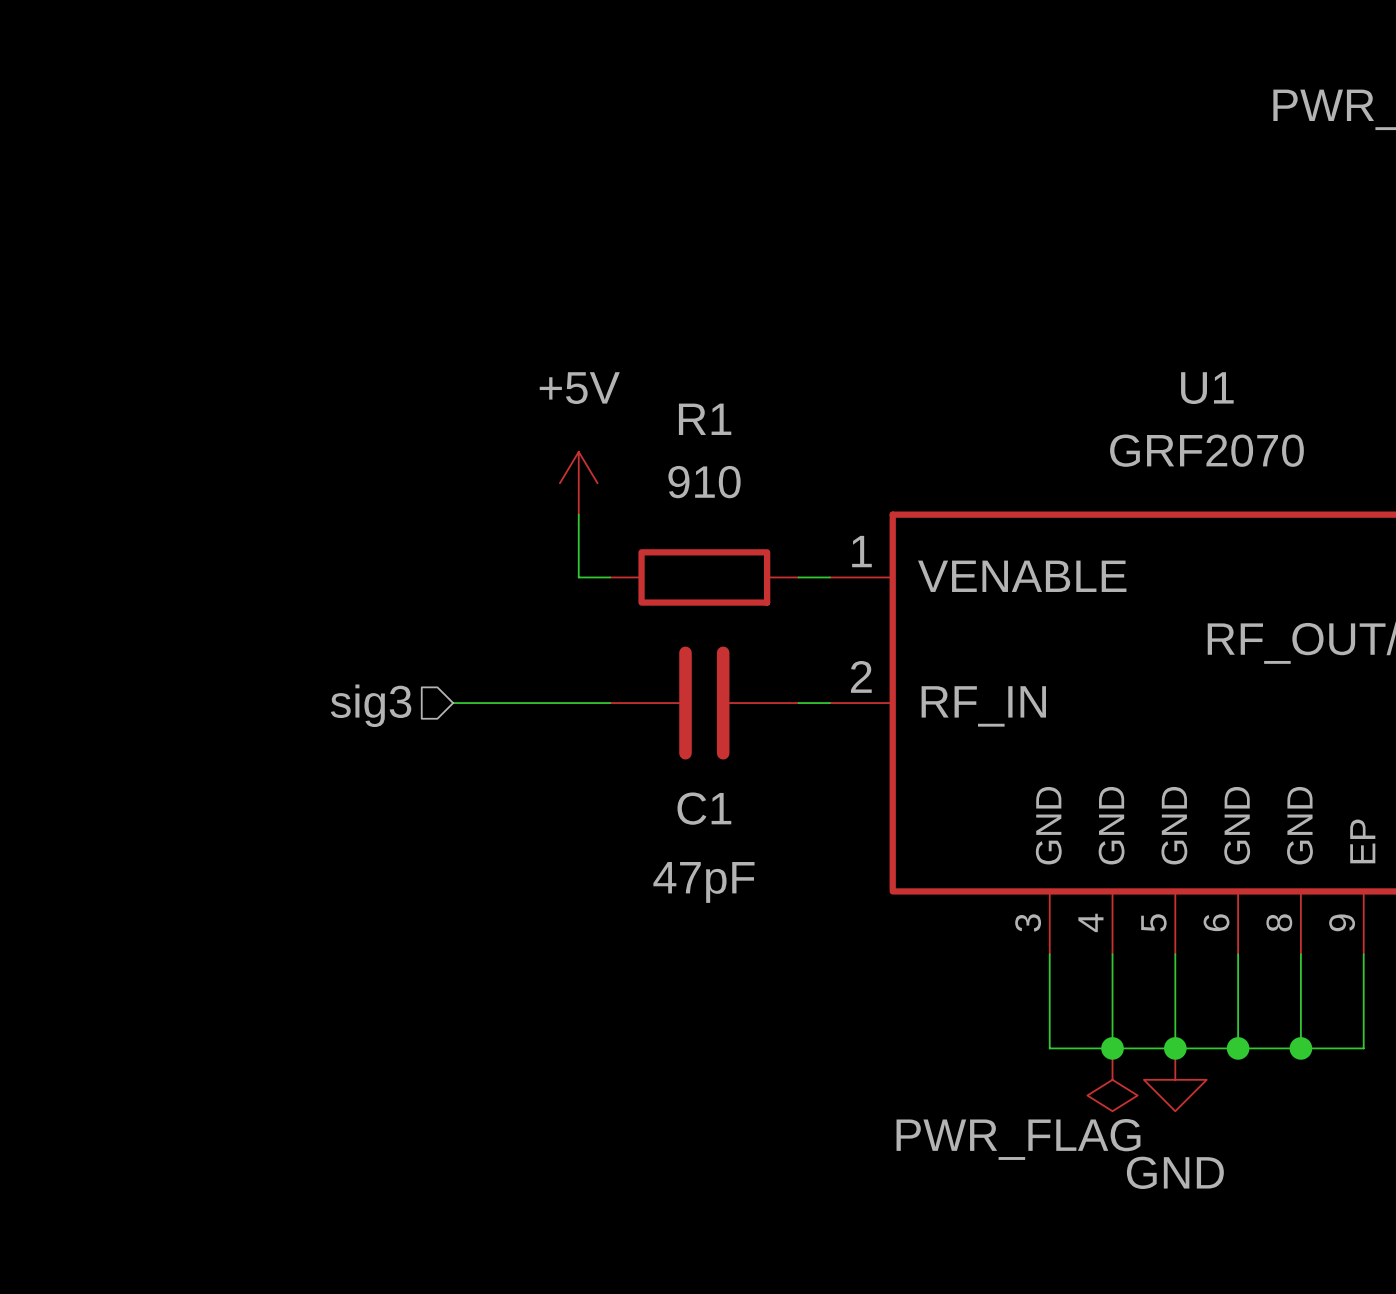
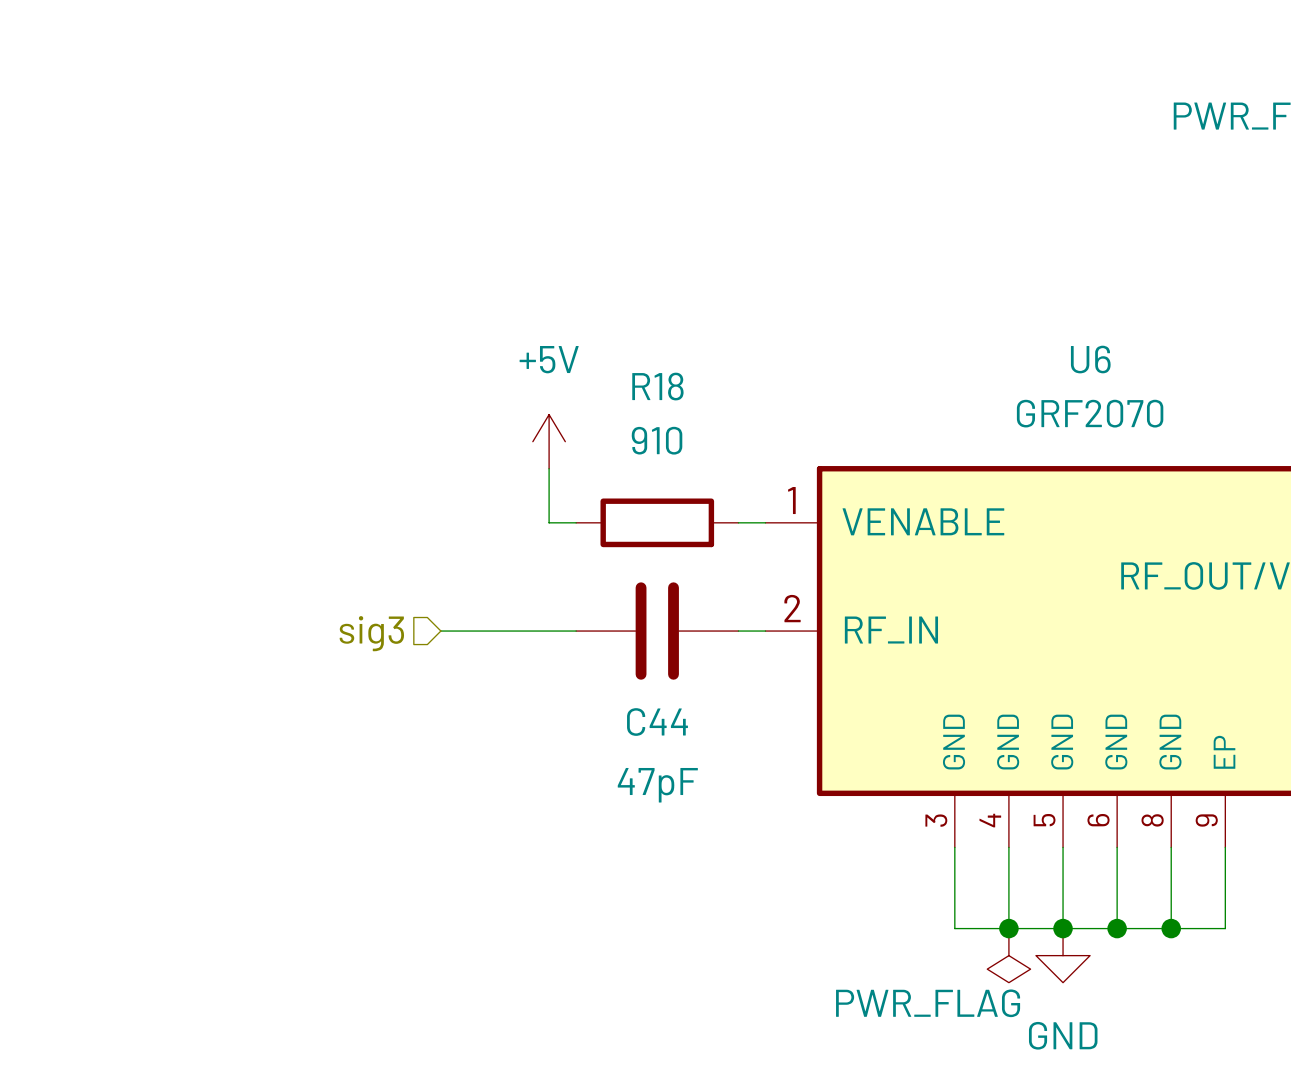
U1 name: U1 (1207, 388) -> U6 (1090, 359)
R1 name: R1 (705, 419) -> R18 (657, 386)
C1 name: C1 (704, 808) -> C44 (657, 722)

